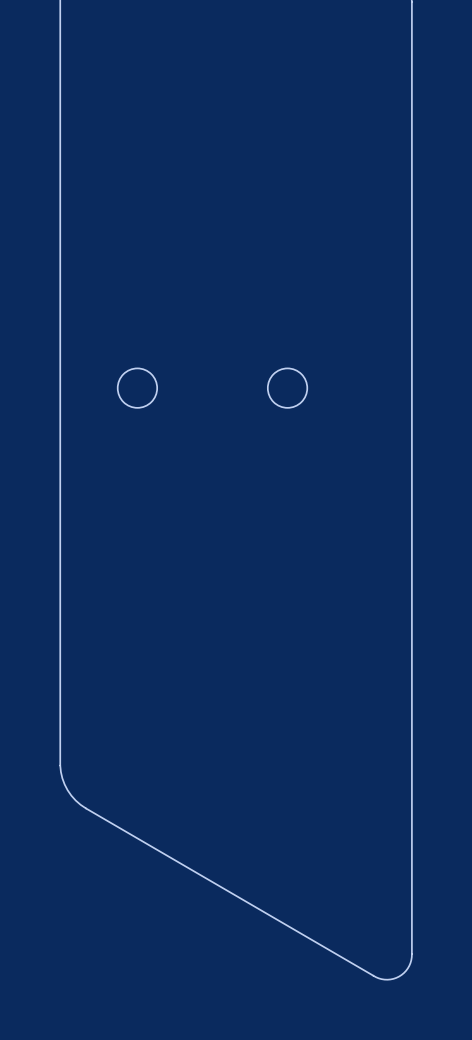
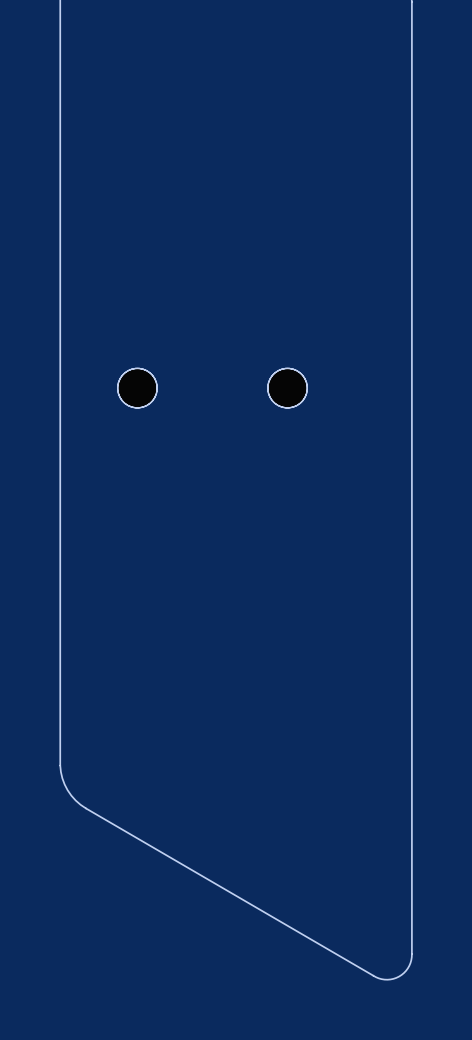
drawing: [116, 367, 159, 409] -> none
drawing: [266, 367, 309, 409] -> none
part: none -> (137, 388)
part: none -> (287, 388)

